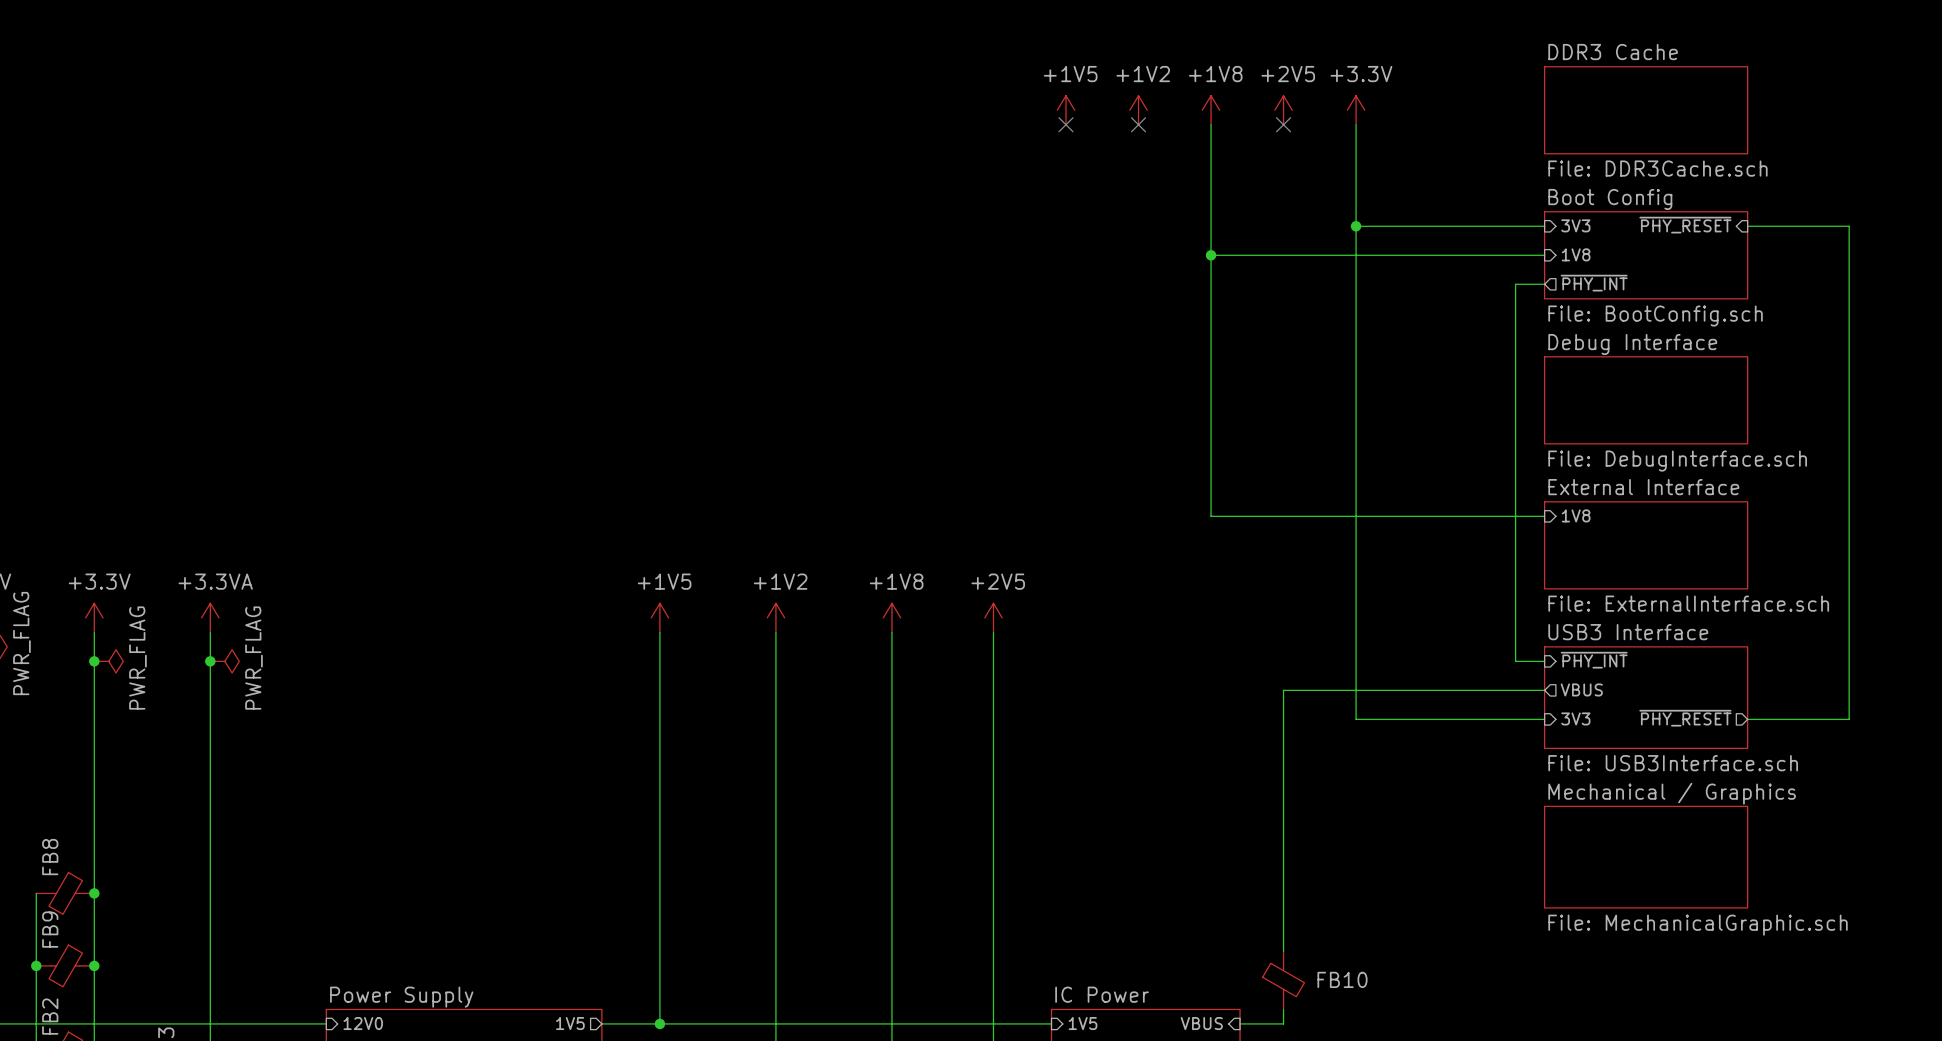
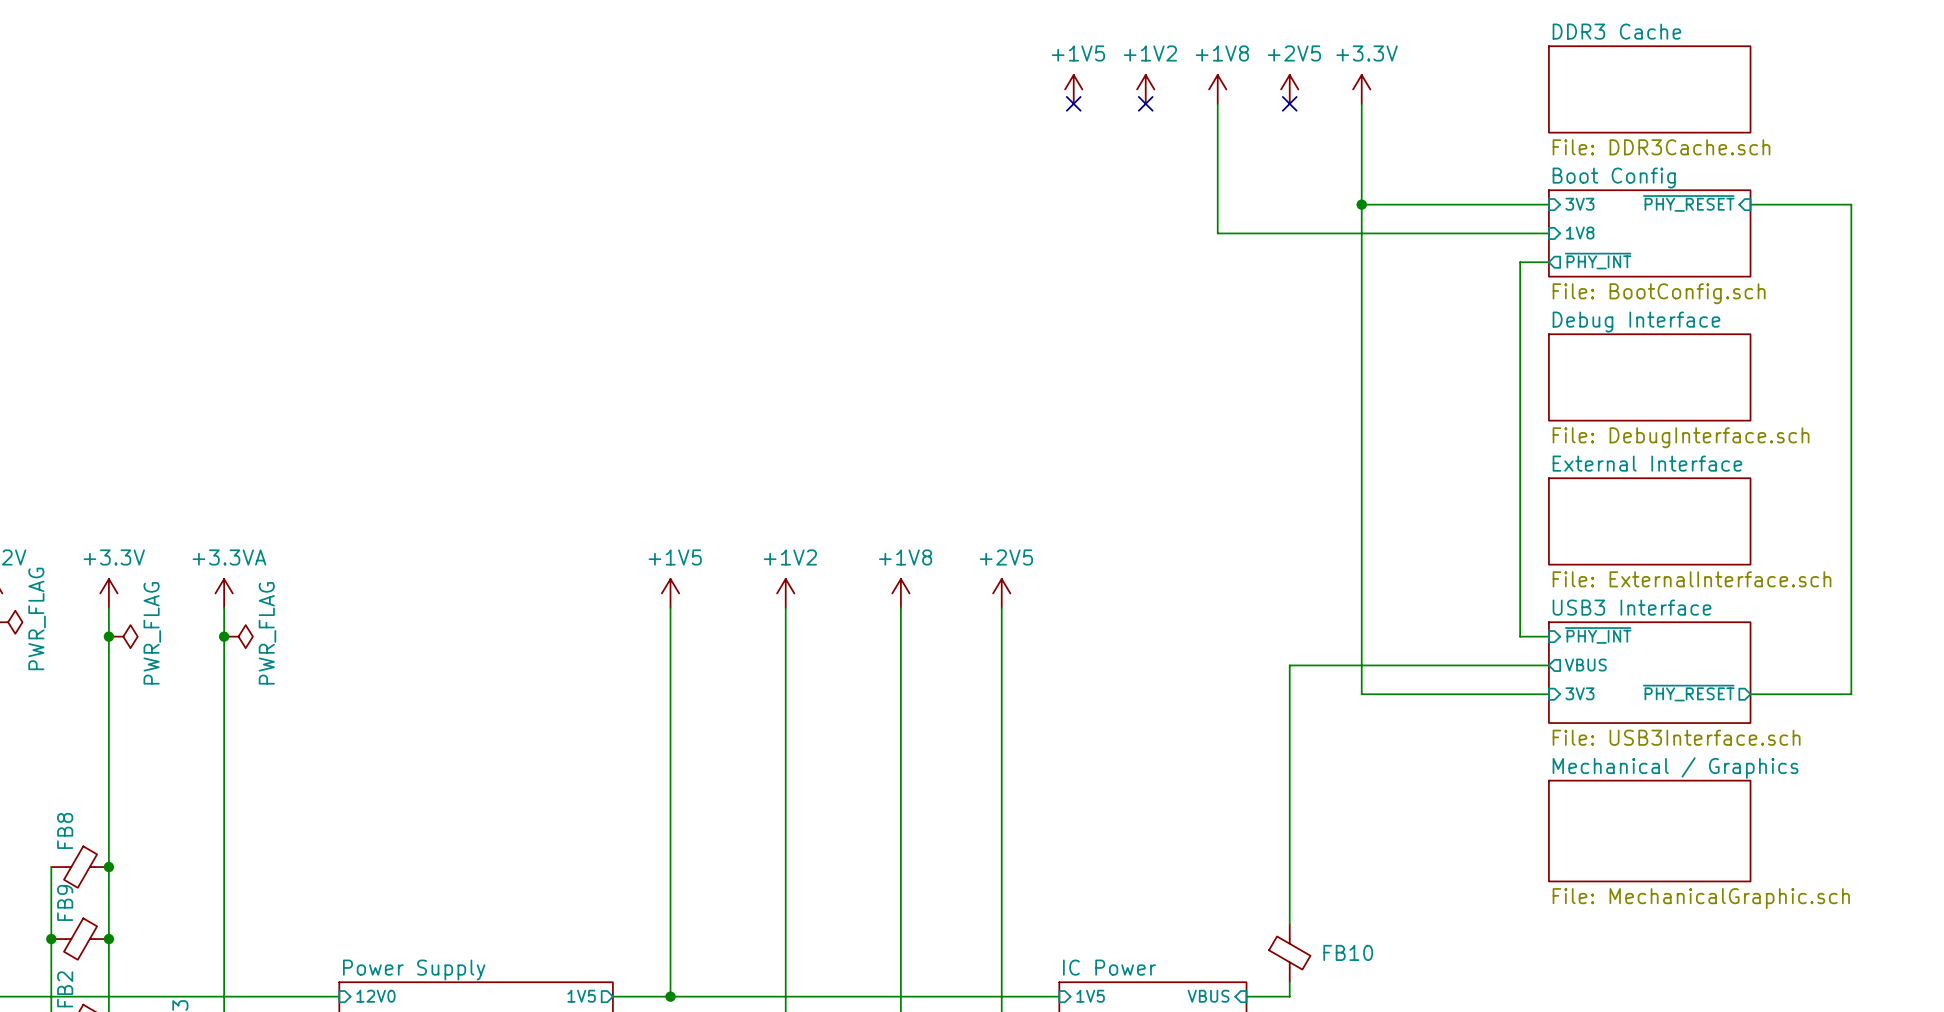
wire: (1211, 255) (1211, 516) (1544, 516) -> none
junction: (1211, 255) -> none
sheet pin: 1V8 (1576, 515) -> none

